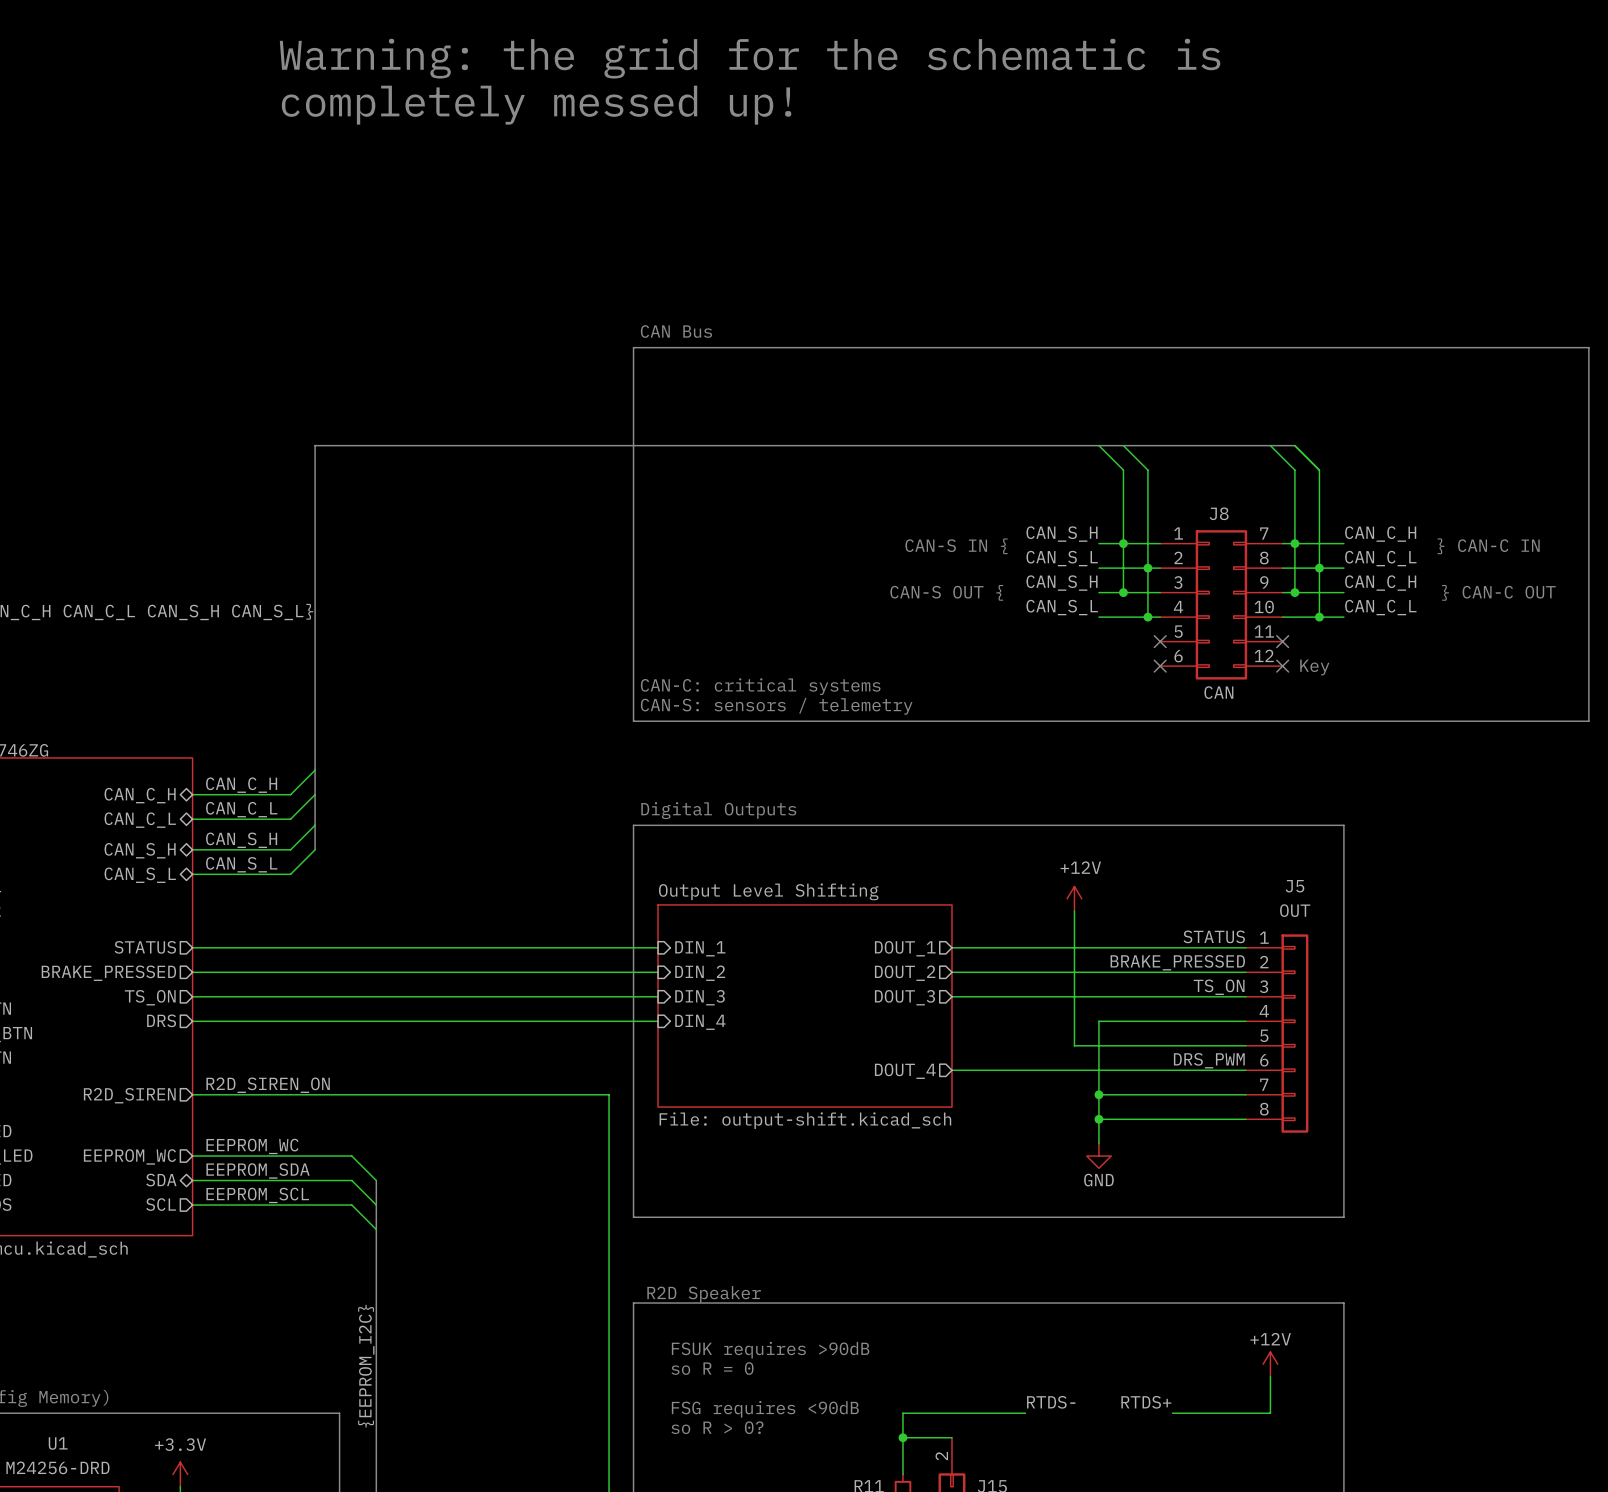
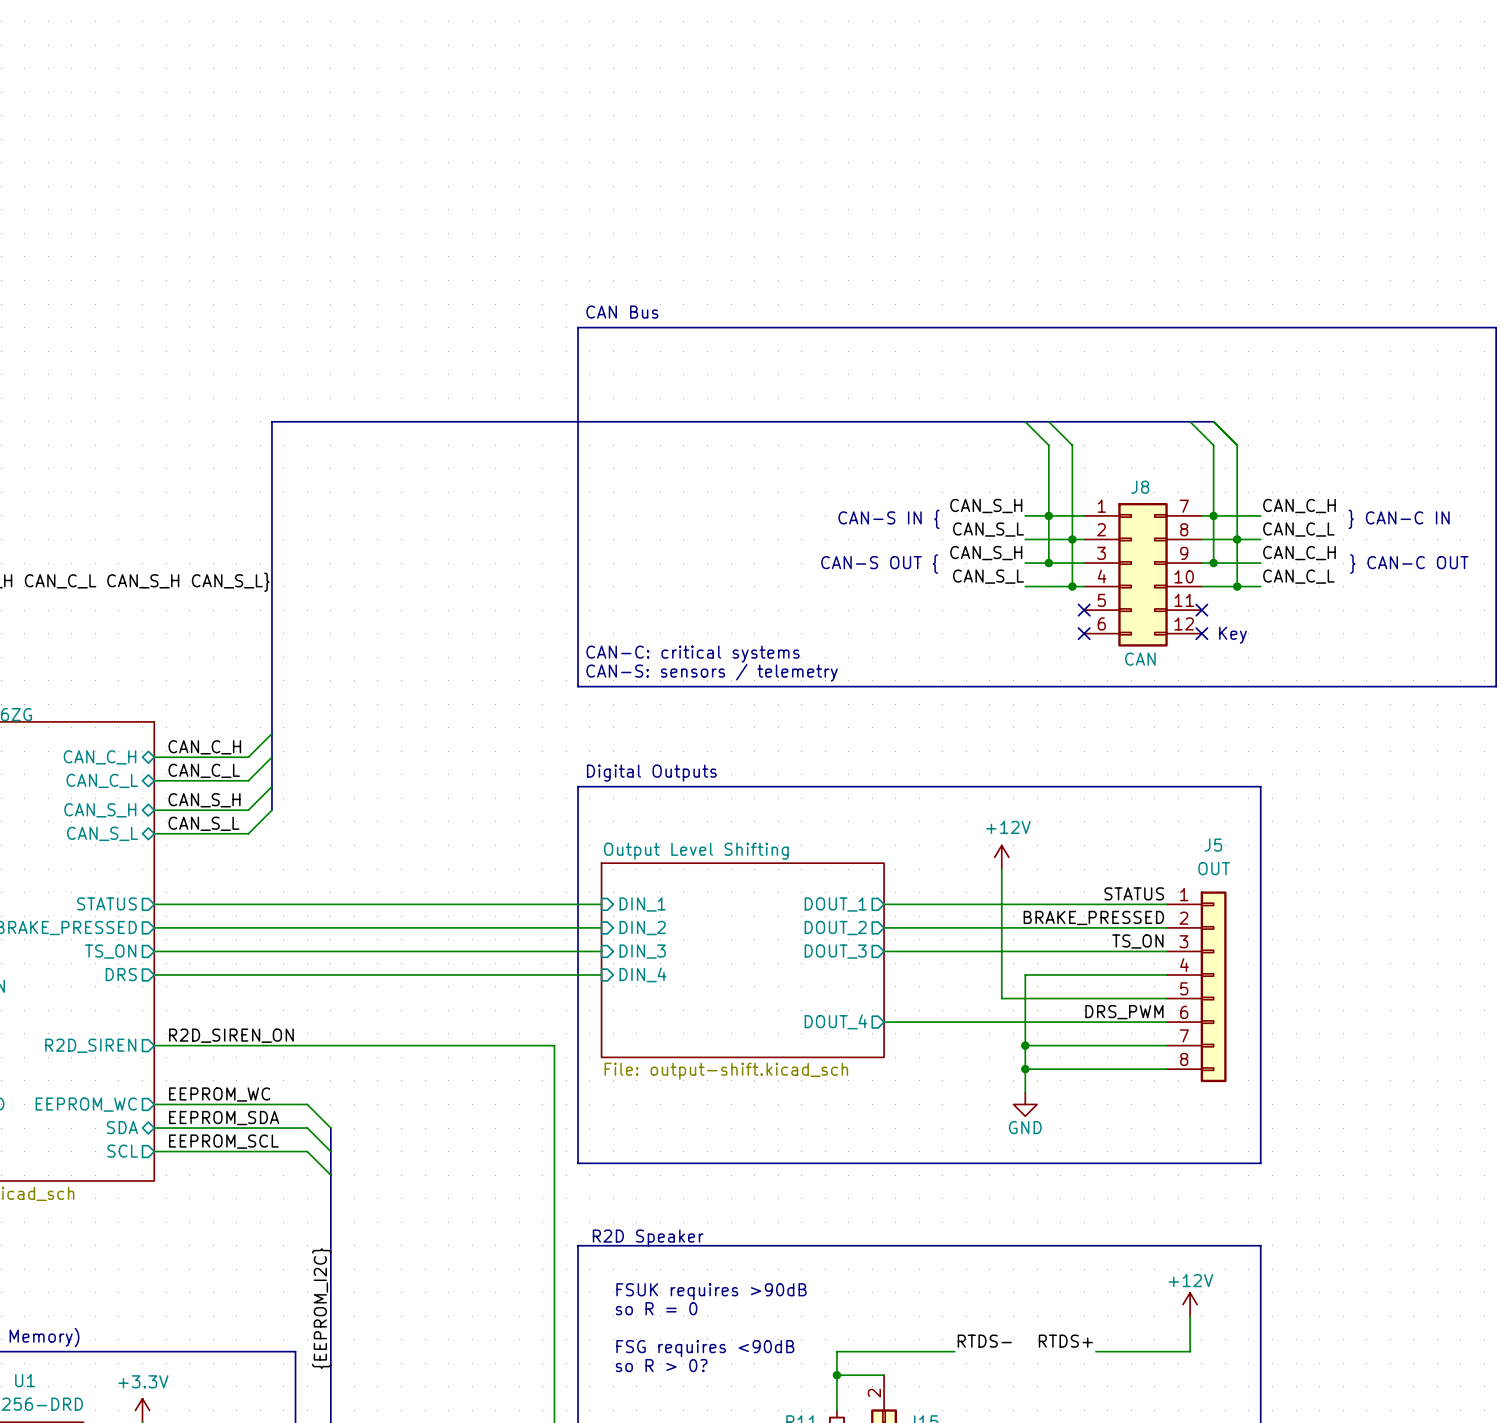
text: Warning: the grid for the schematic is (750, 58) -> none
text: completely messed up! (536, 105) -> none

